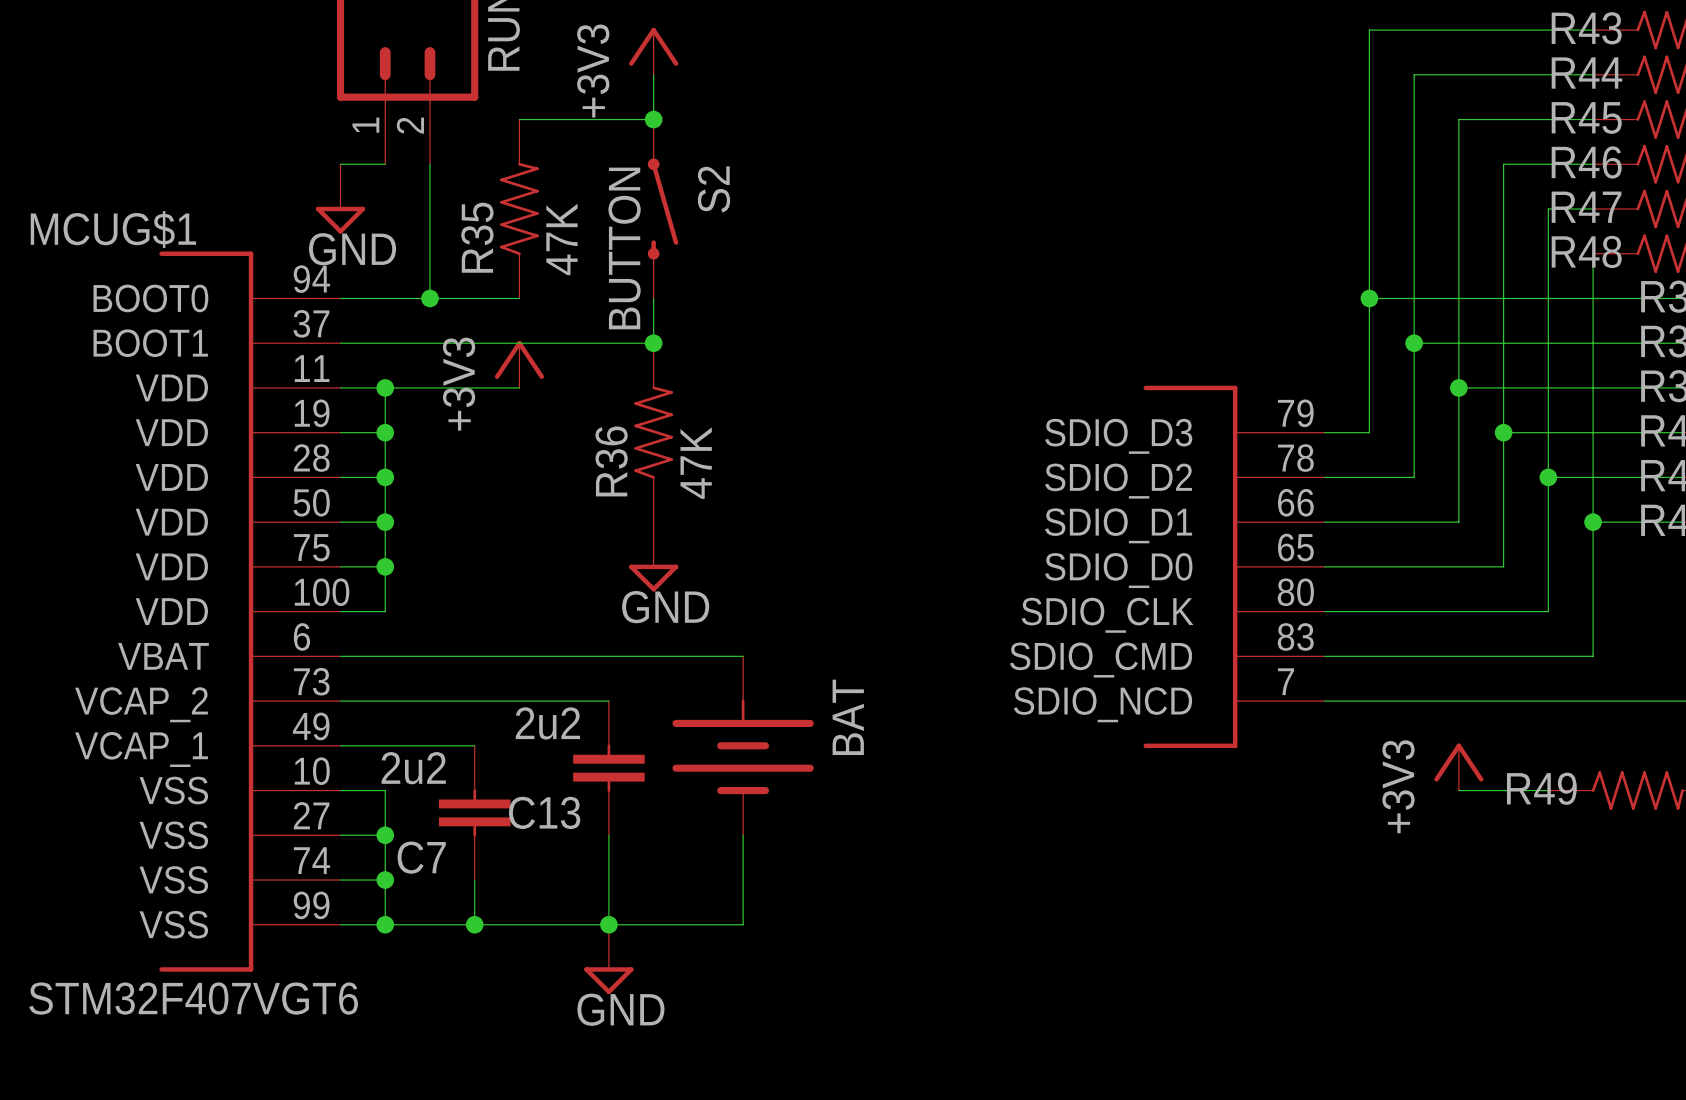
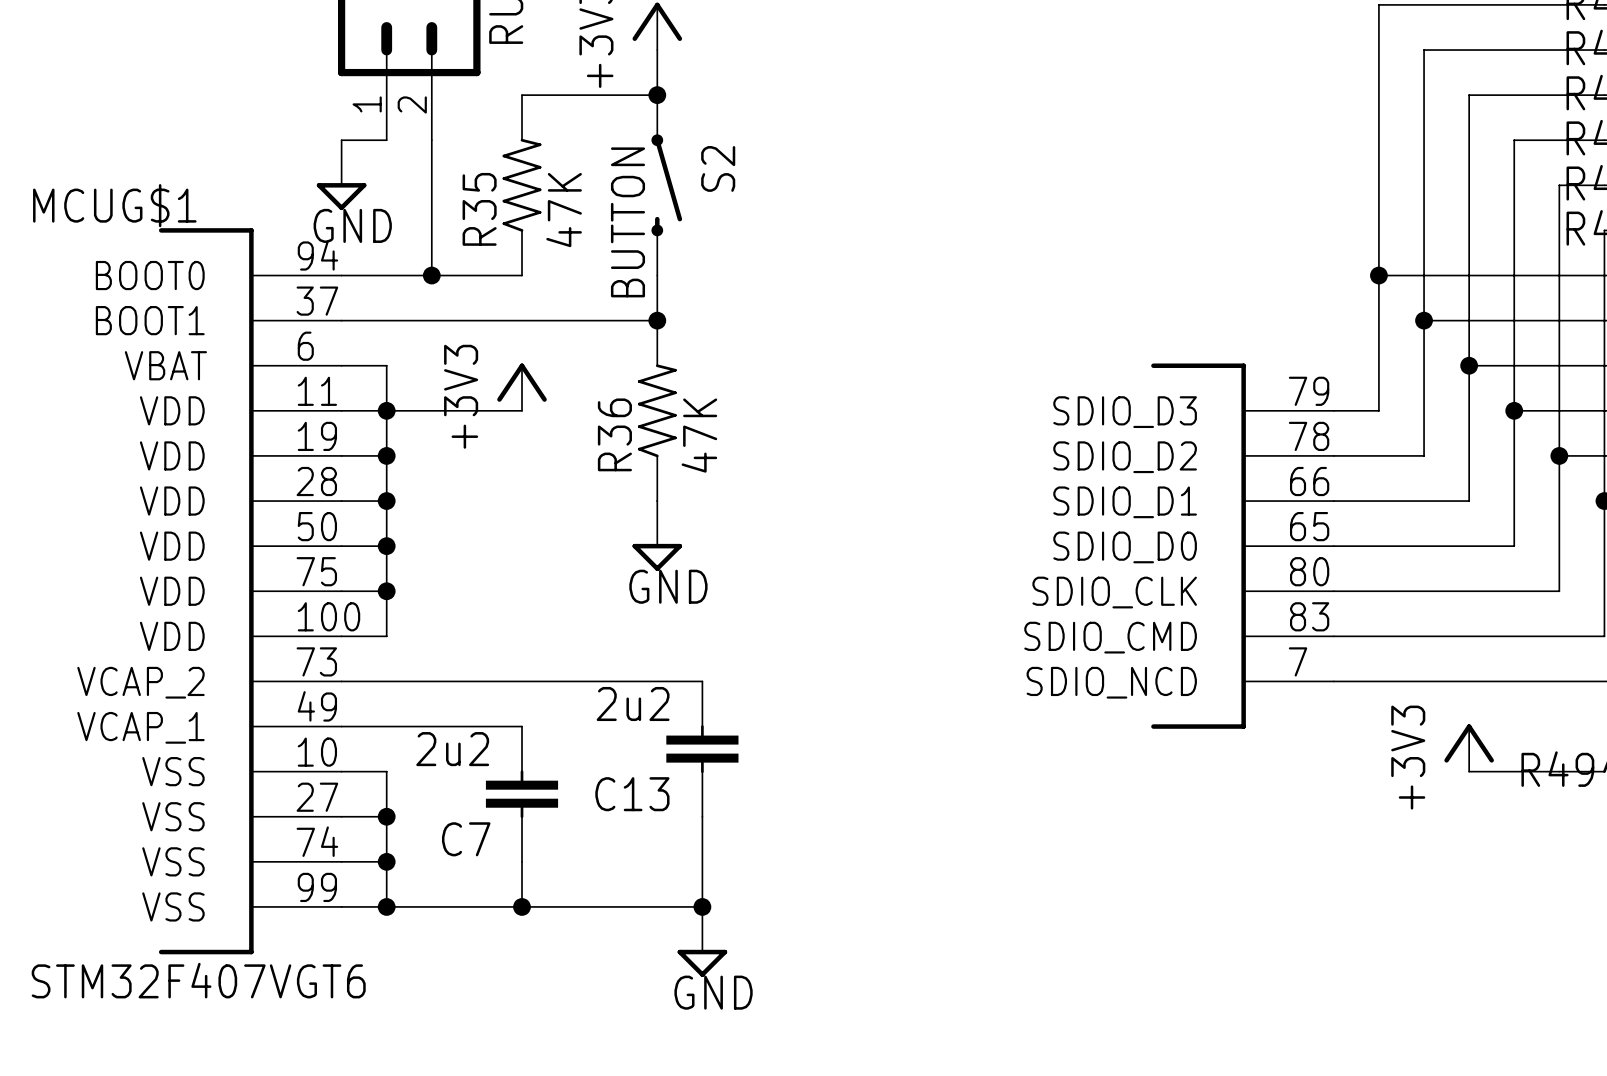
MCUG$1 symbol: [159, 251, 341, 972] -> [158, 228, 342, 955]
power symbol position: +3V3 (519, 364) -> +3V3 (522, 387)
wire: (385, 387) (519, 387) -> (386, 410) (522, 410)
junction: (385, 387) -> none
junction: none -> (386, 591)
wire: (385, 656) (743, 656) -> (386, 636) (386, 591)
wire: none -> (612, 681) (702, 681)
wire: none -> (476, 726) (522, 726)
BAT: (743, 745) -> none
C13 position: (608, 768) -> (702, 749)
C7 position: (474, 812) -> (522, 794)
wire: (608, 835) (608, 924) -> none
wire: (743, 835) (743, 924) (698, 924) -> (702, 816) (702, 906)
wire: (474, 880) (474, 924) -> (522, 861) (522, 906)
junction: (474, 924) -> none
junction: none -> (522, 906)
junction: (608, 924) -> none
junction: none -> (702, 906)
power symbol position: GND (608, 959) -> GND (702, 941)

